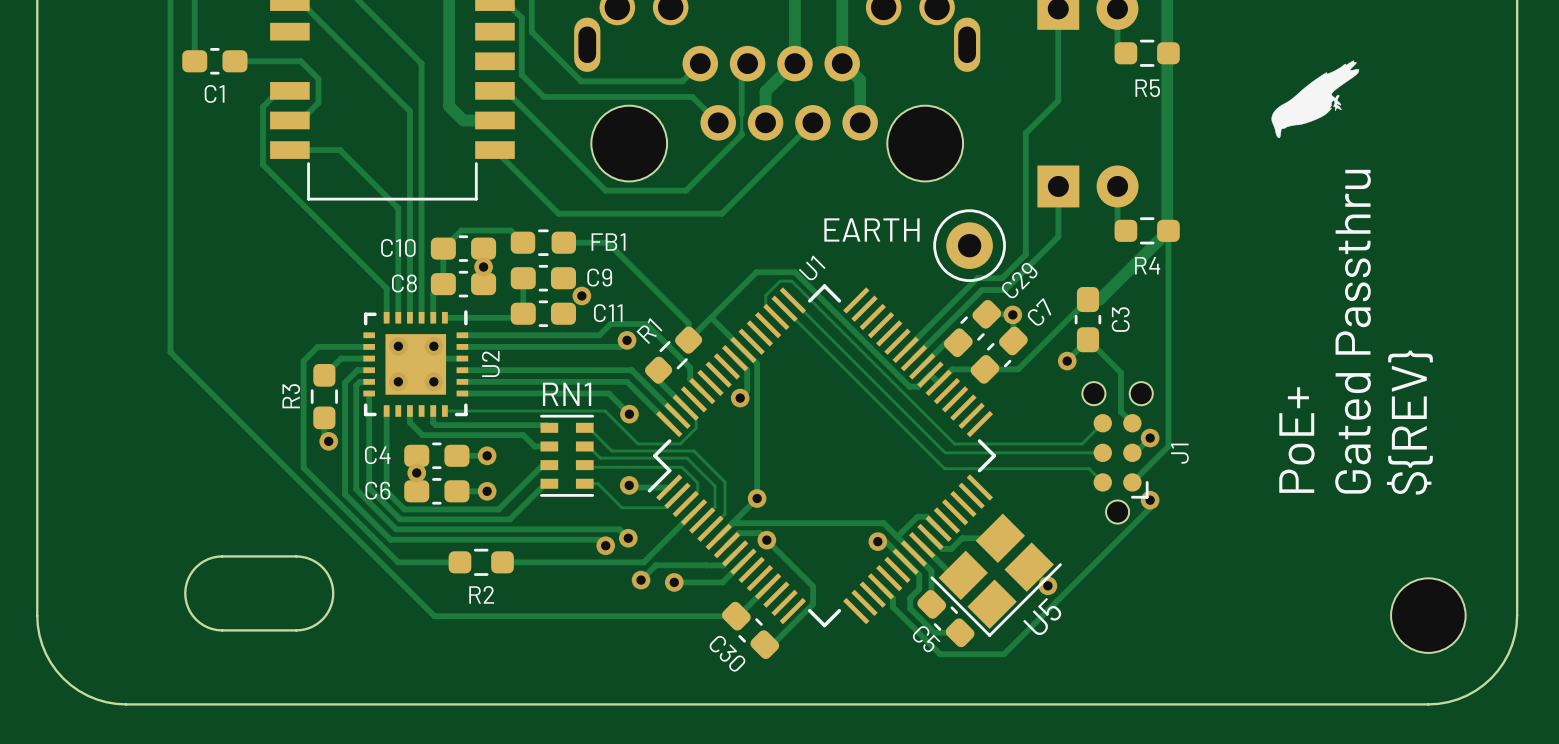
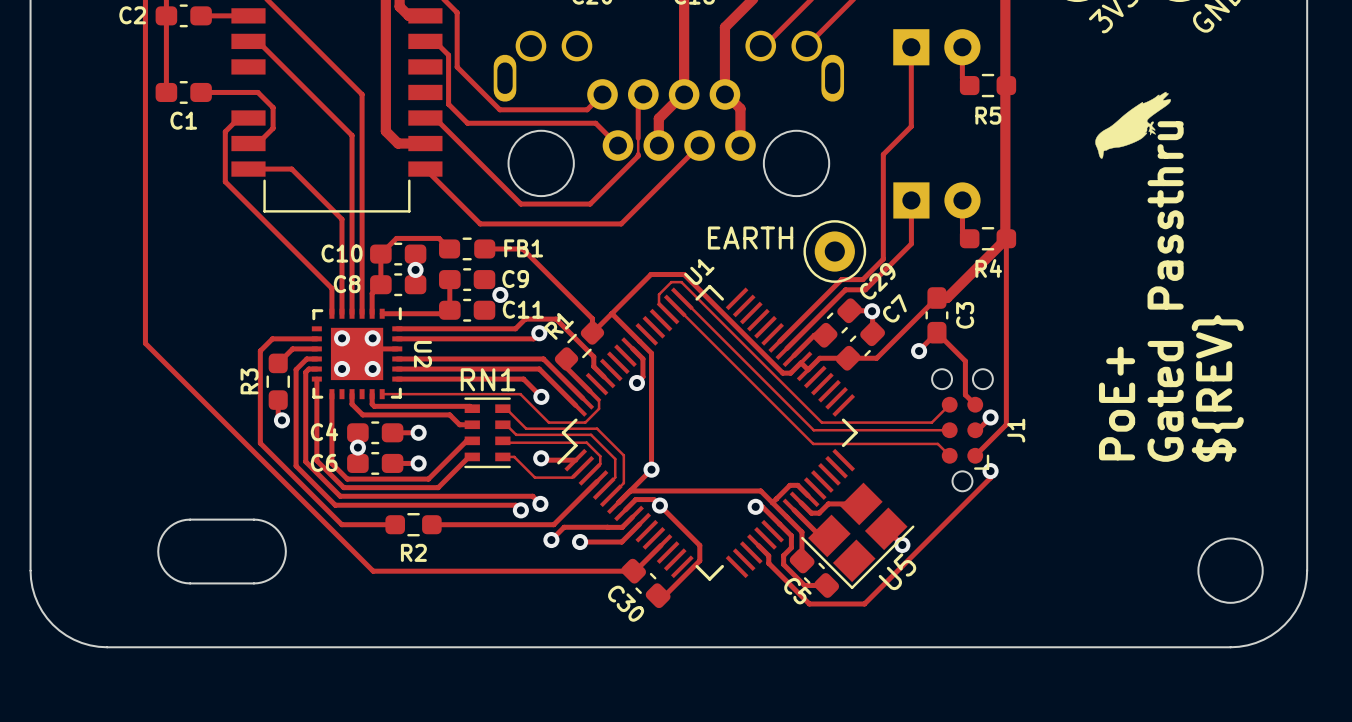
U2 name rotation: 0° (490, 364) -> 180° (422, 354)

